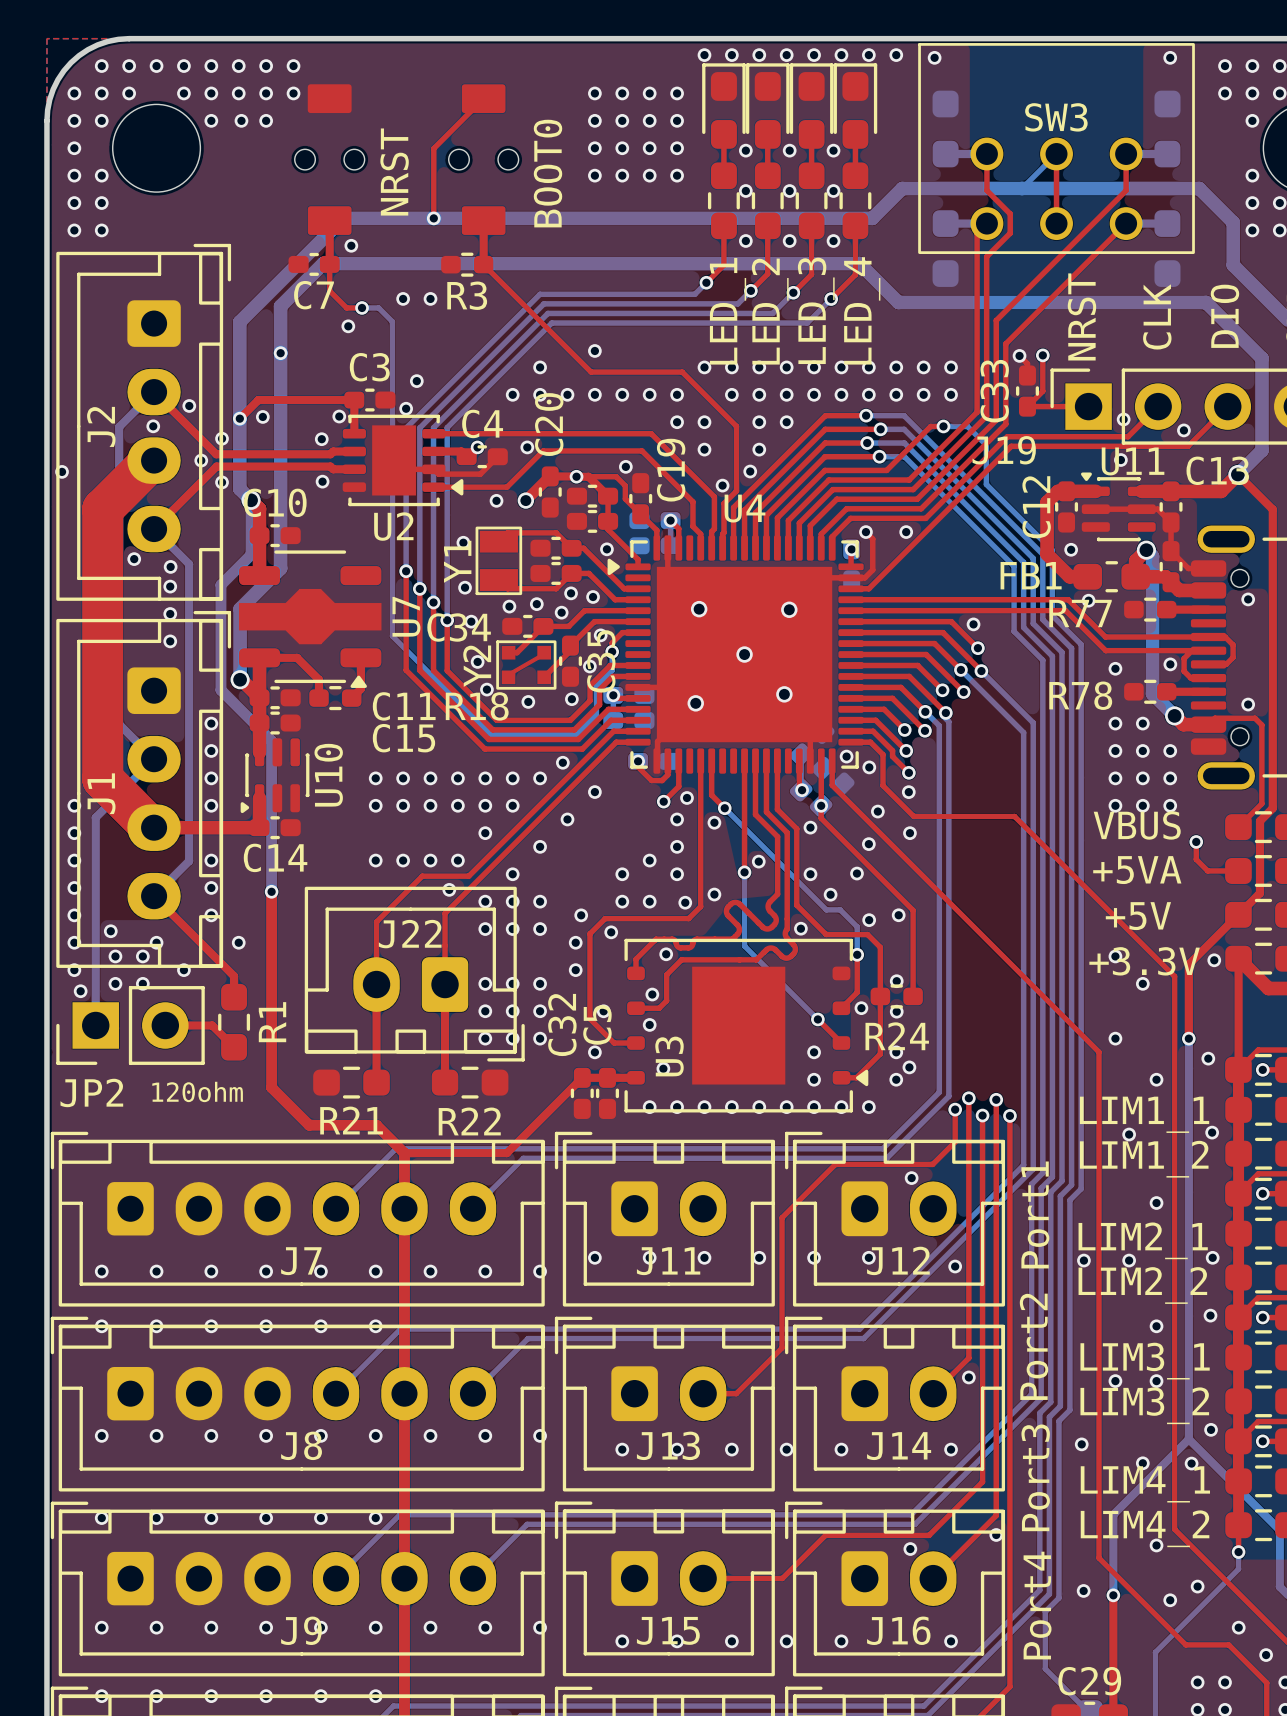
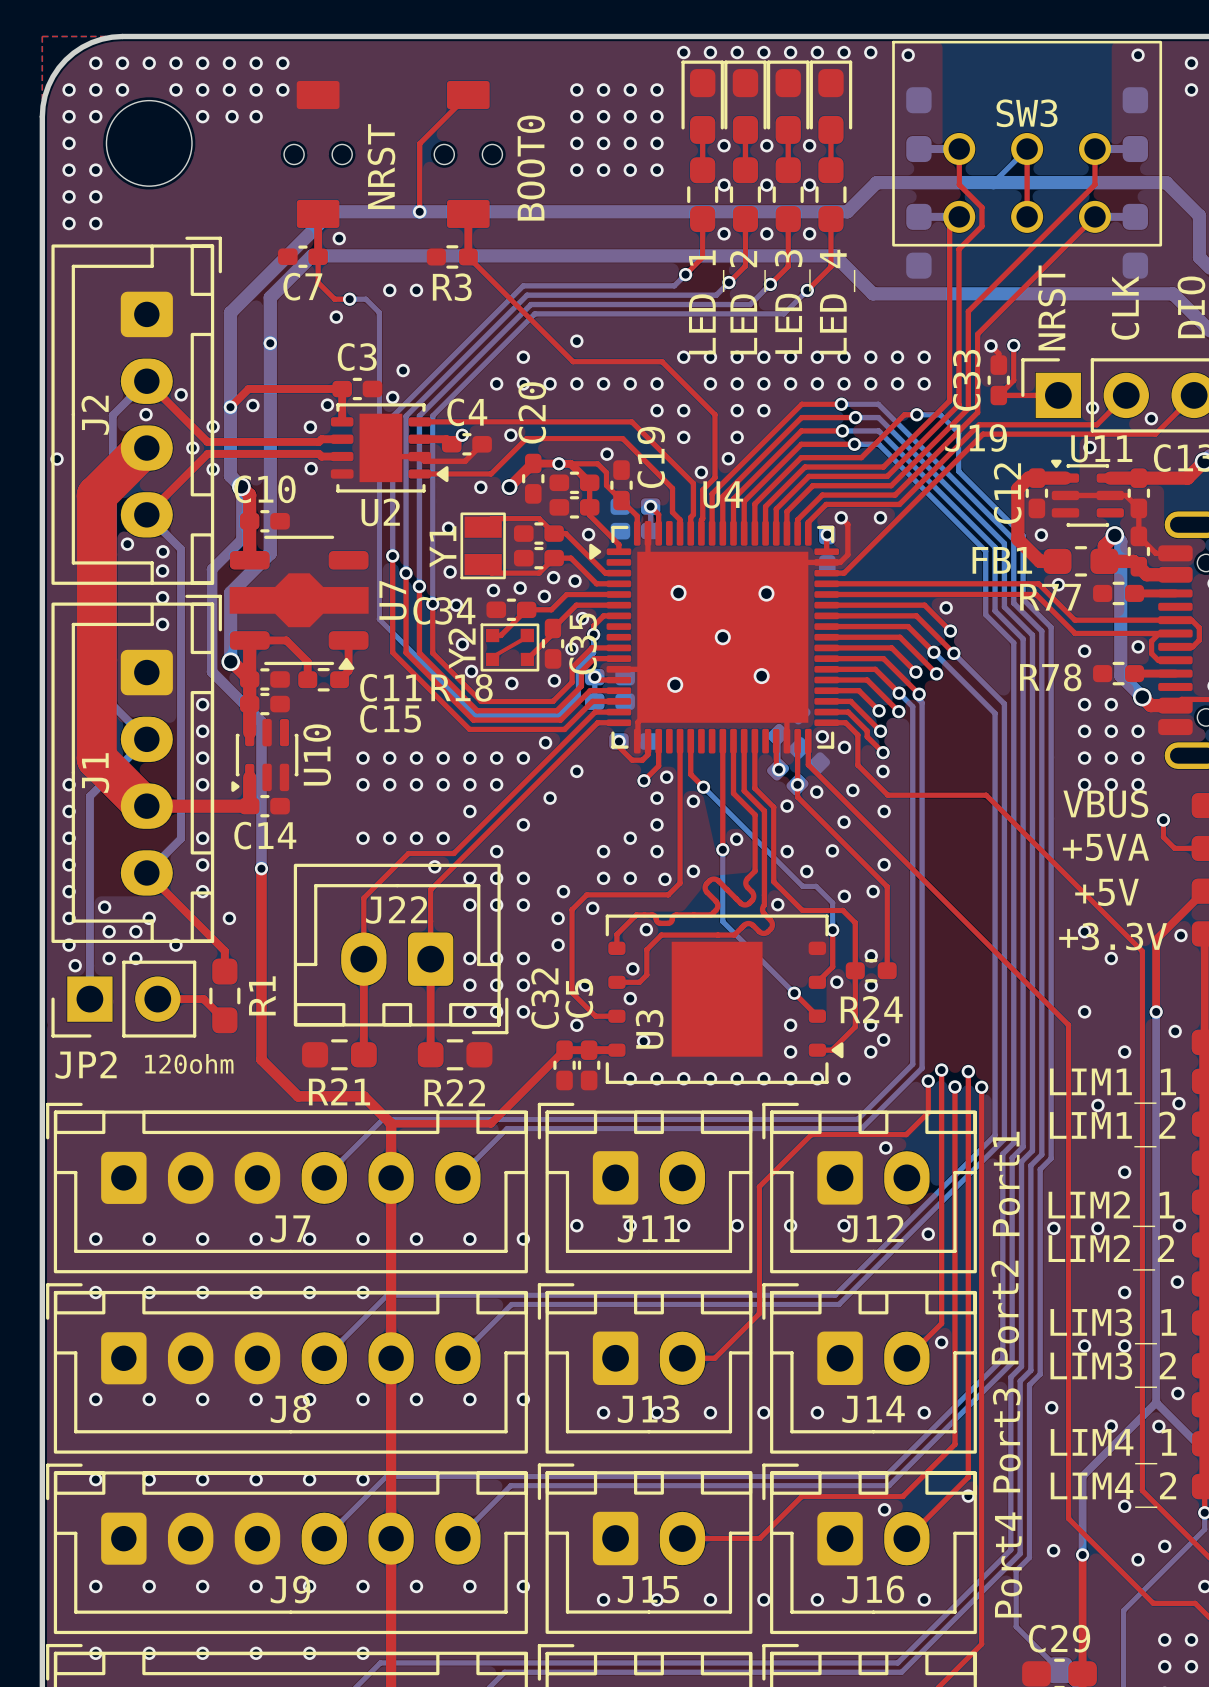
via: none -> (816, 792)
via: none -> (884, 864)

